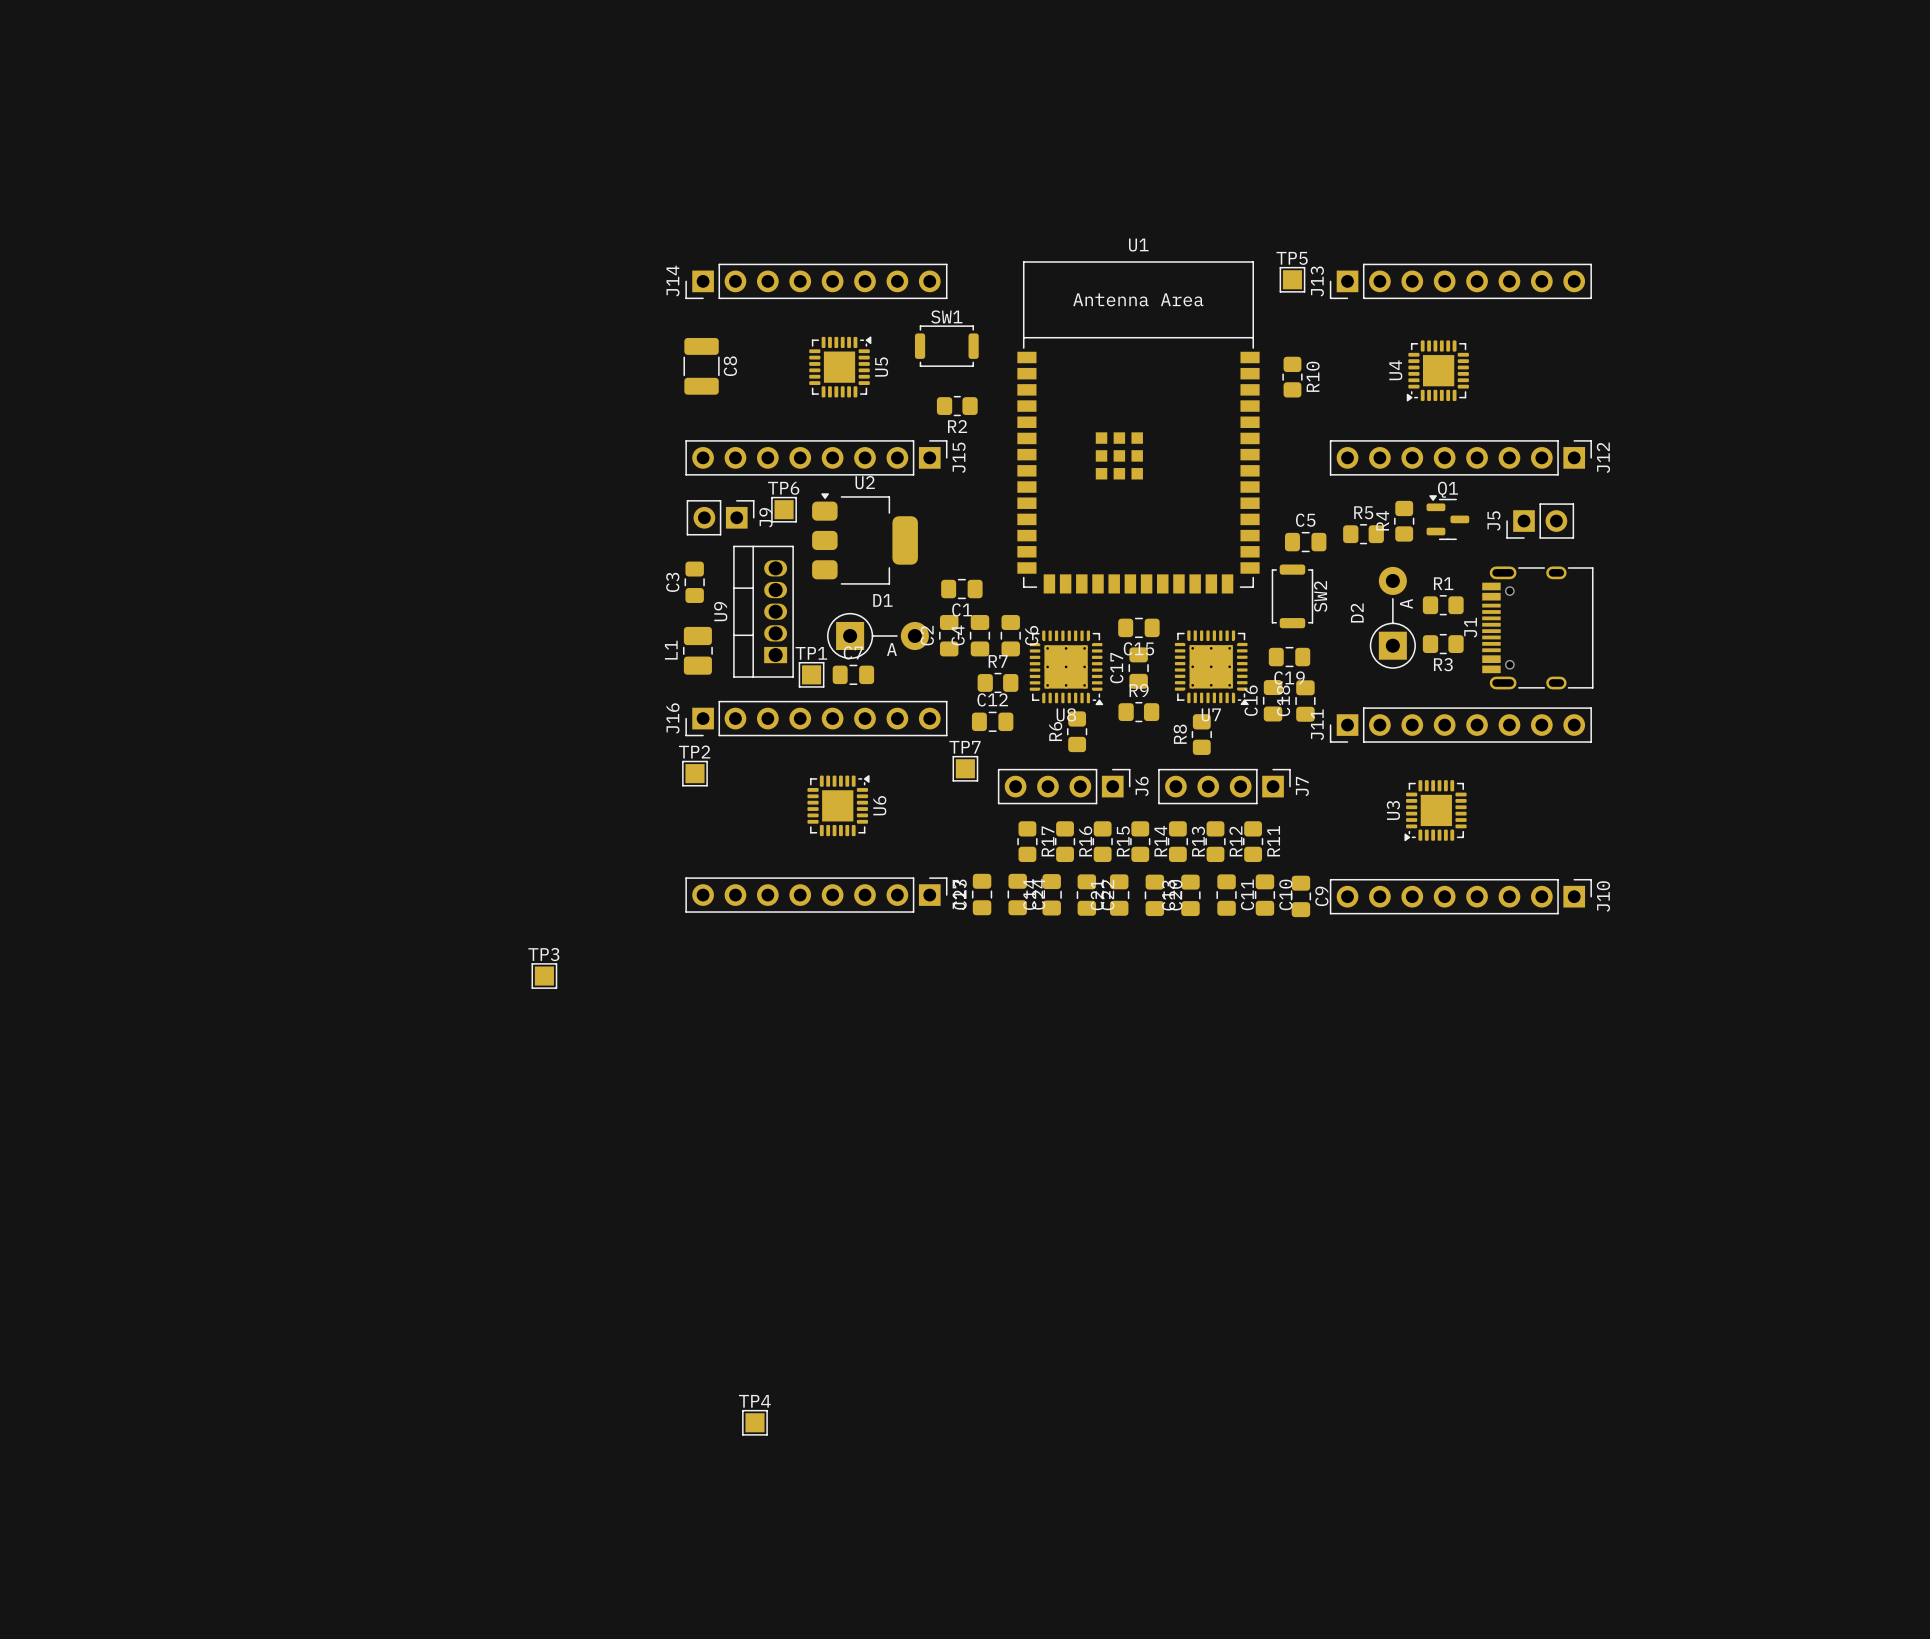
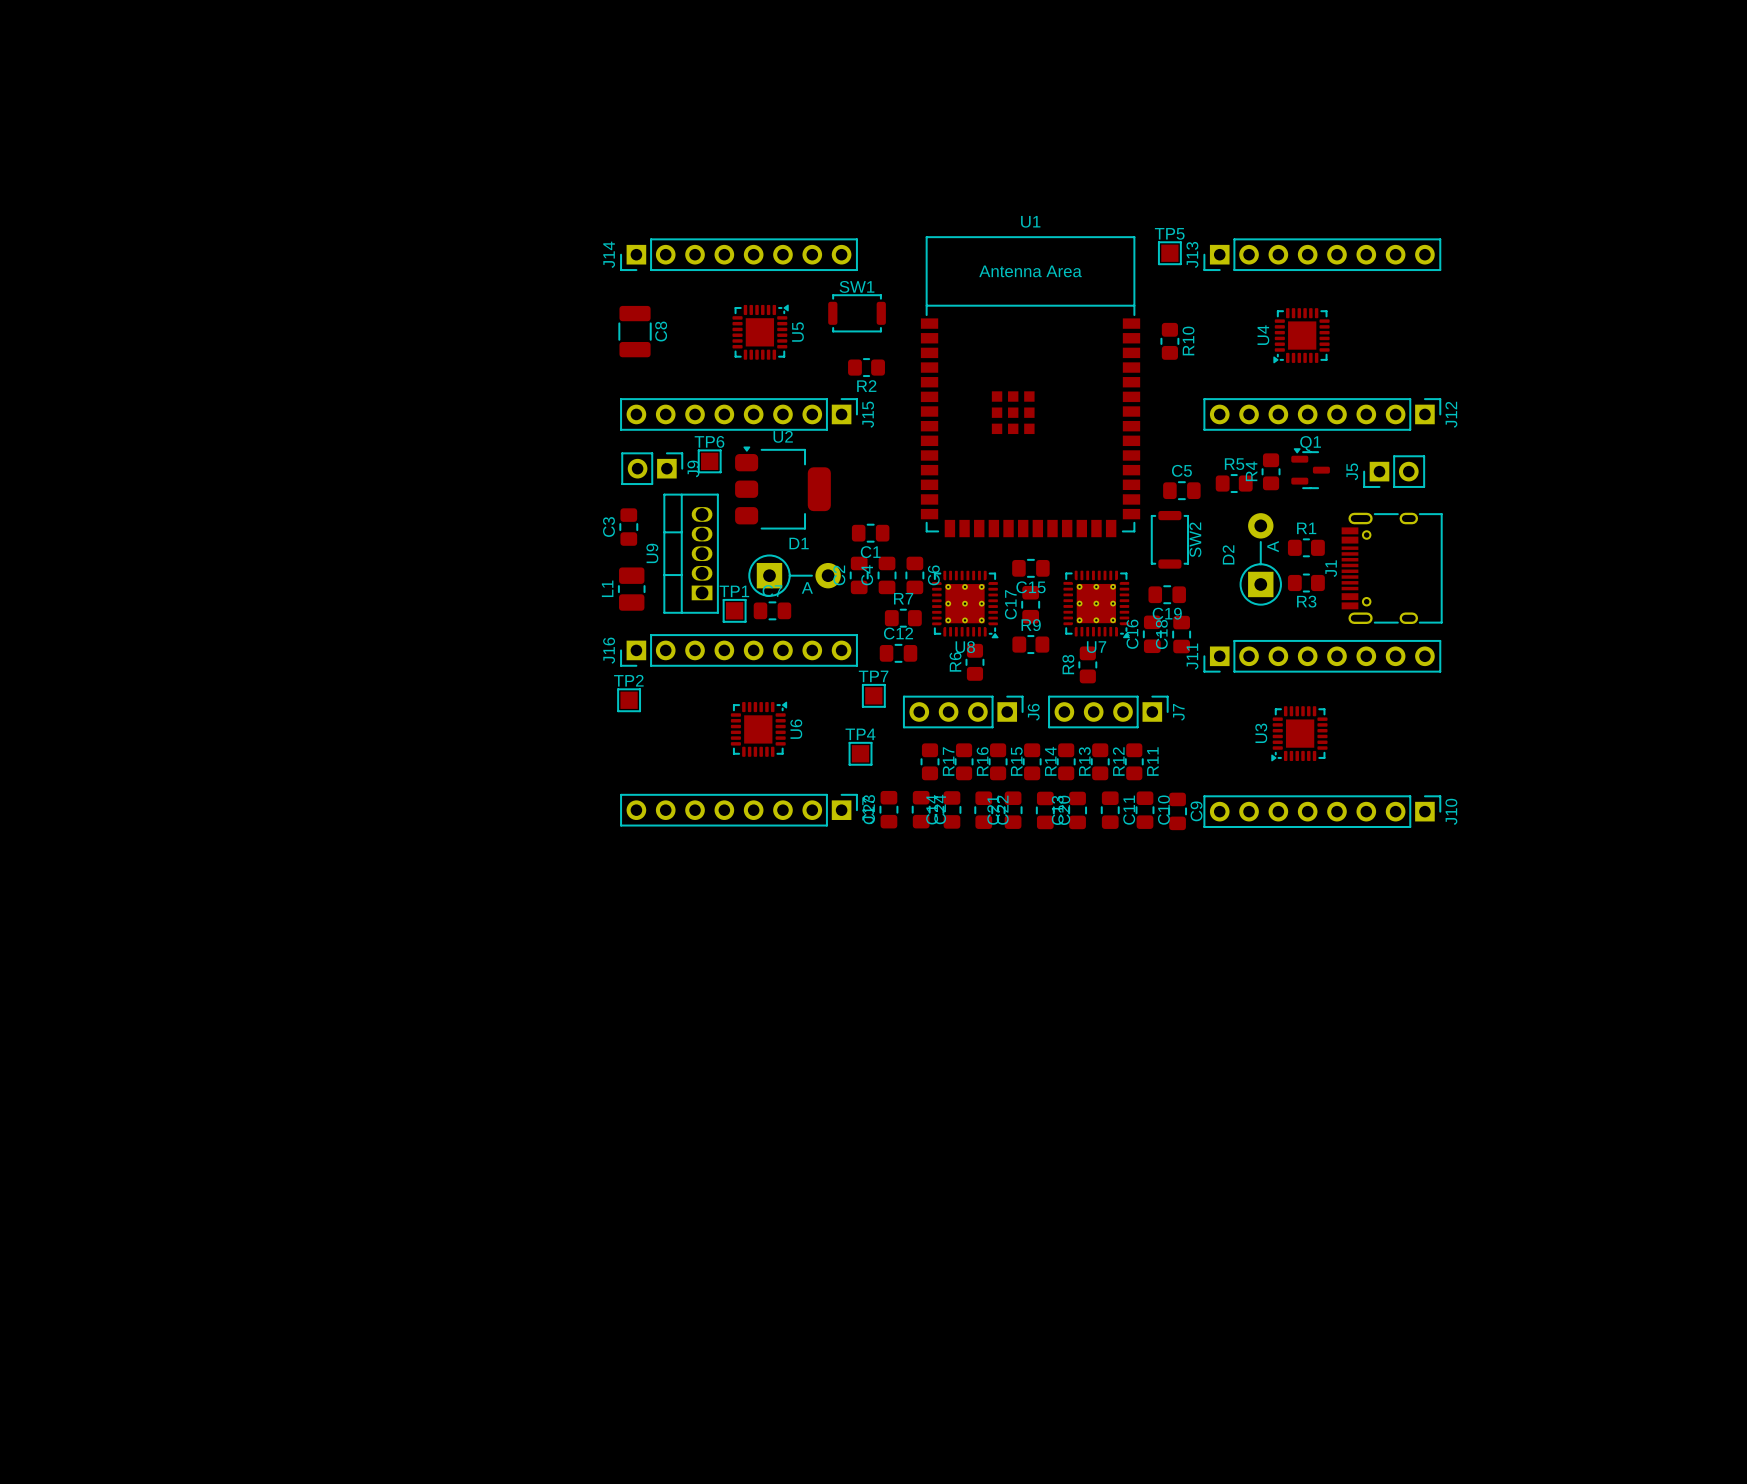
TP3: (544, 976) -> none
TP4 position: (754, 1422) -> (860, 753)

